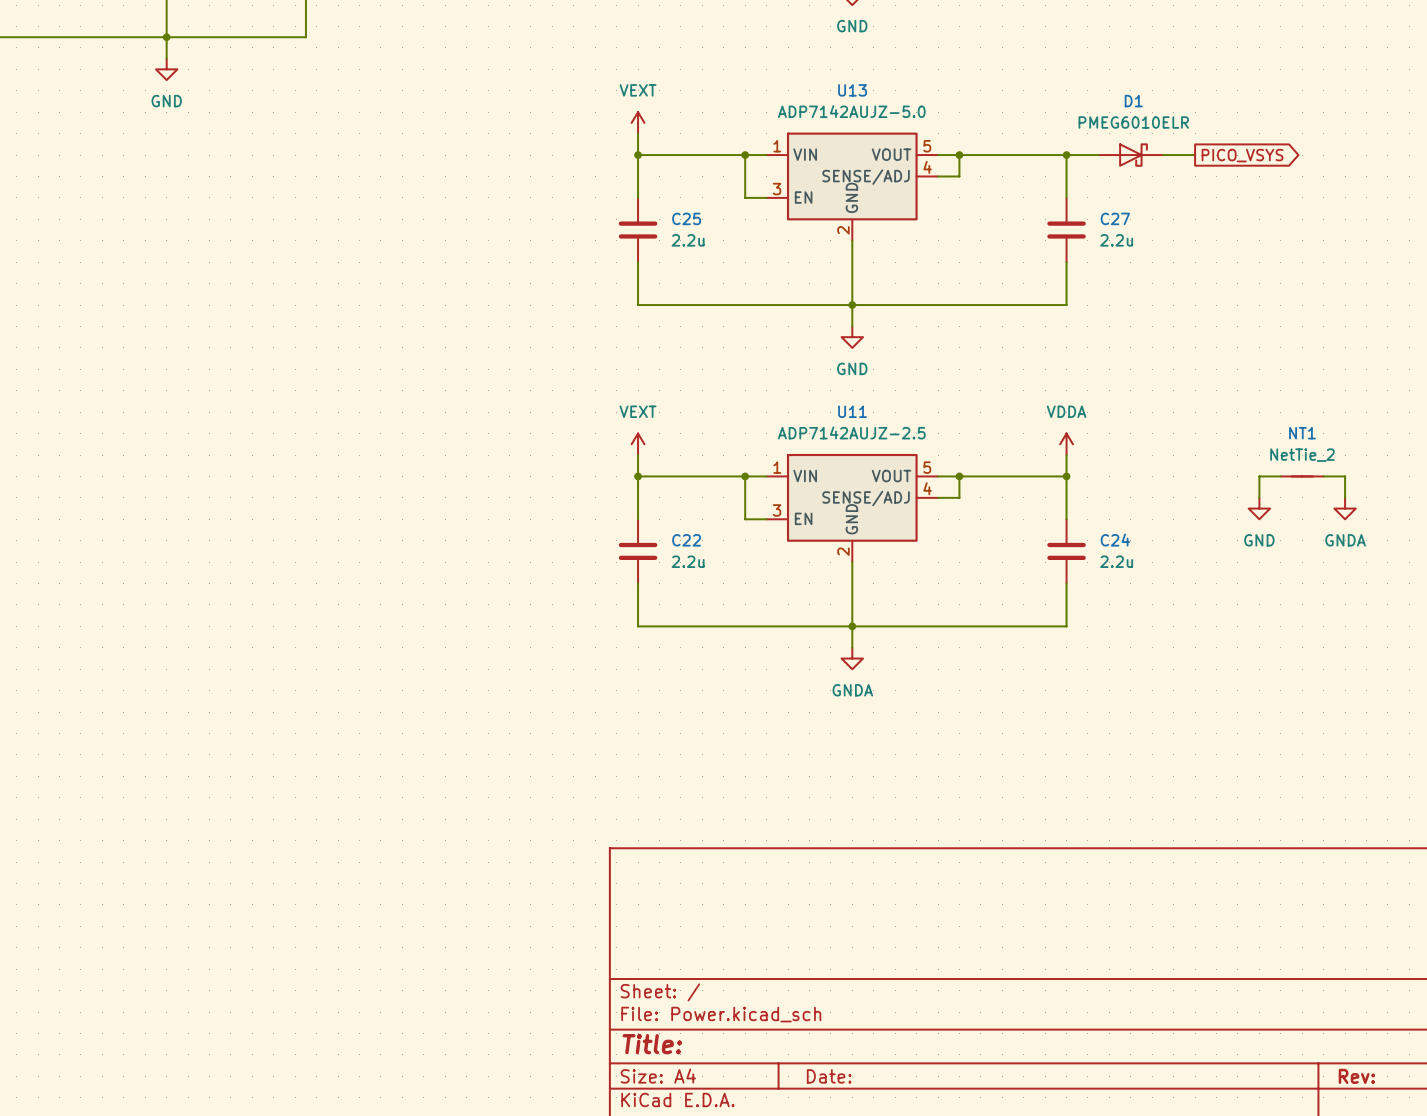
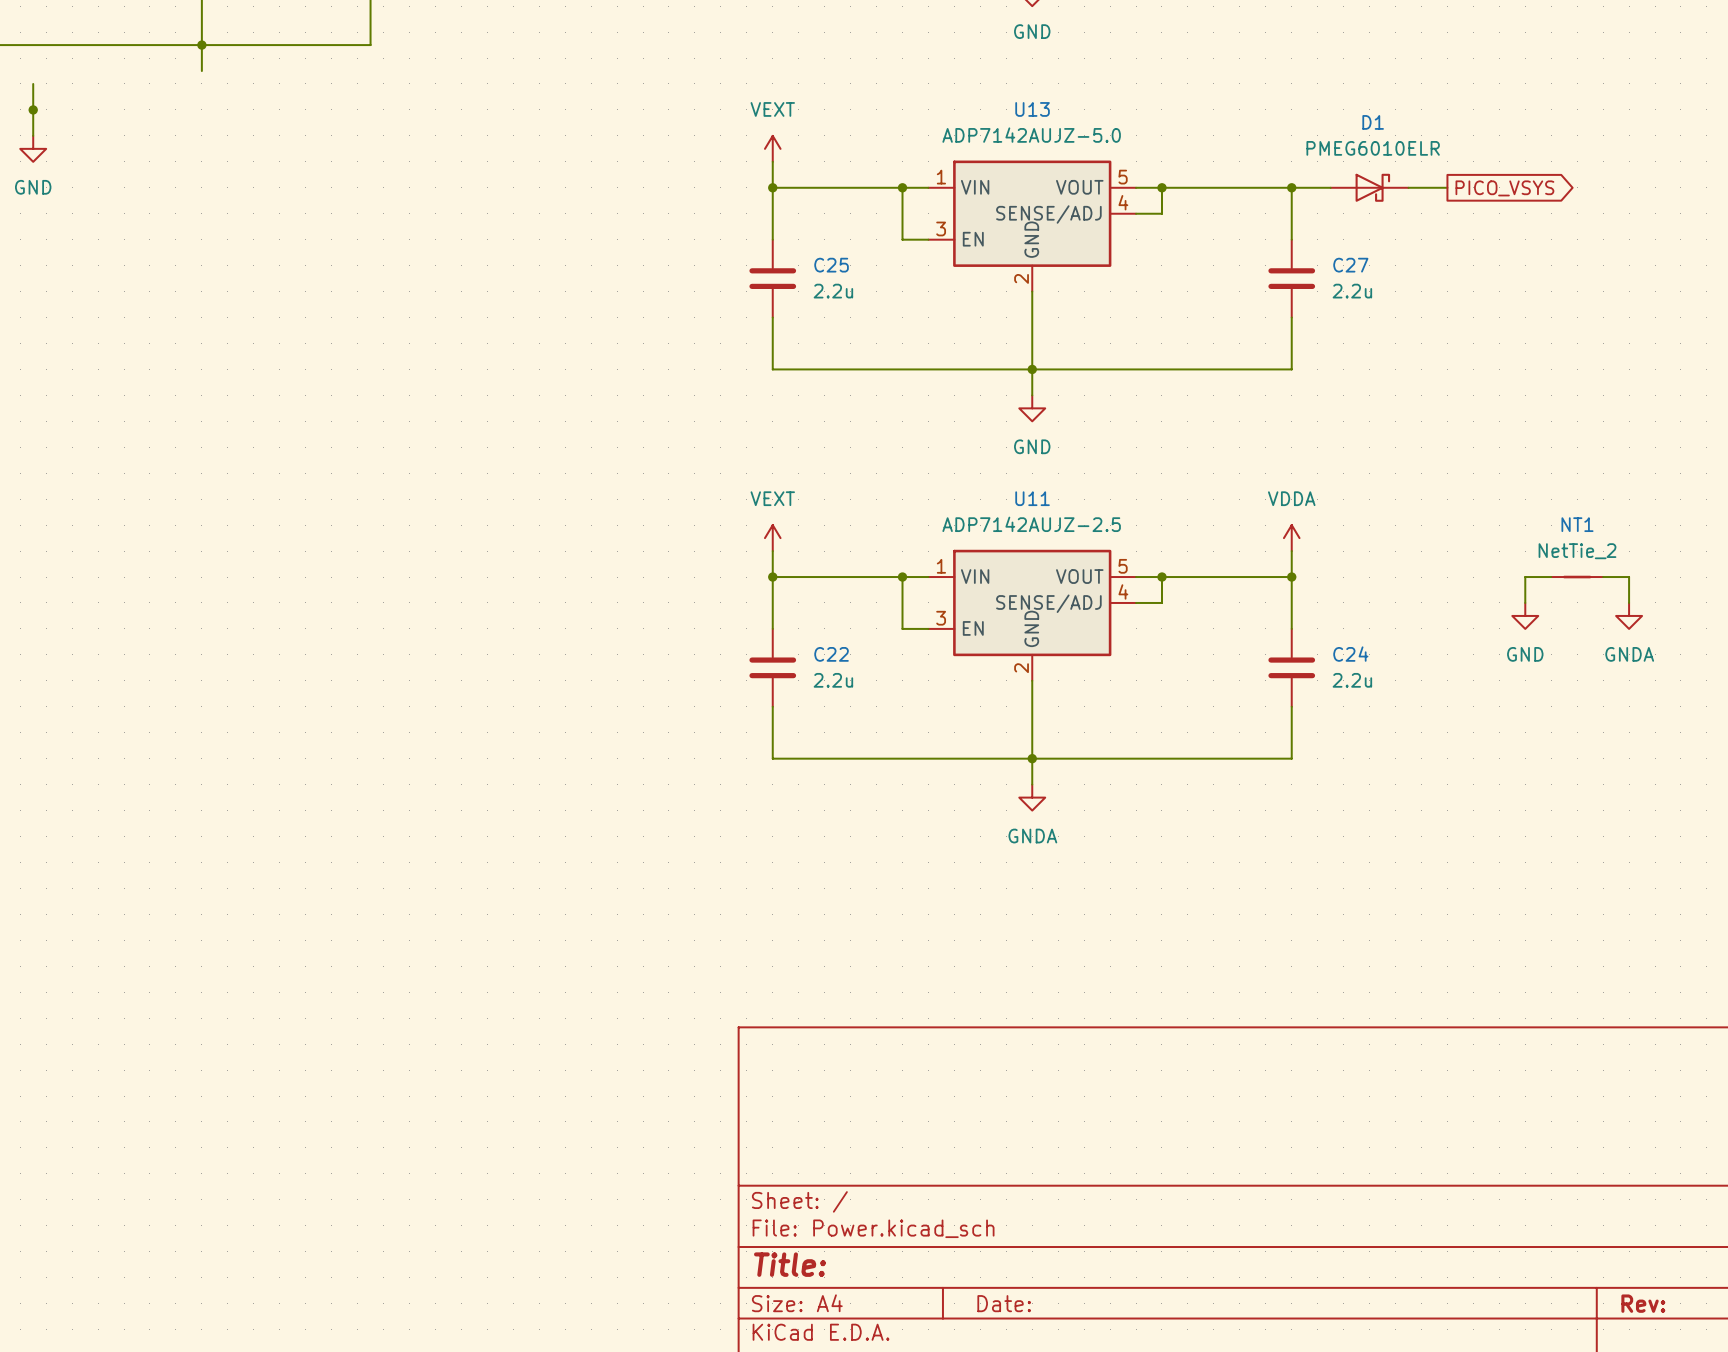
wire: none -> (33, 83) (33, 135)
power symbol position: GND (166, 69) -> GND (33, 148)
junction: none -> (33, 109)

